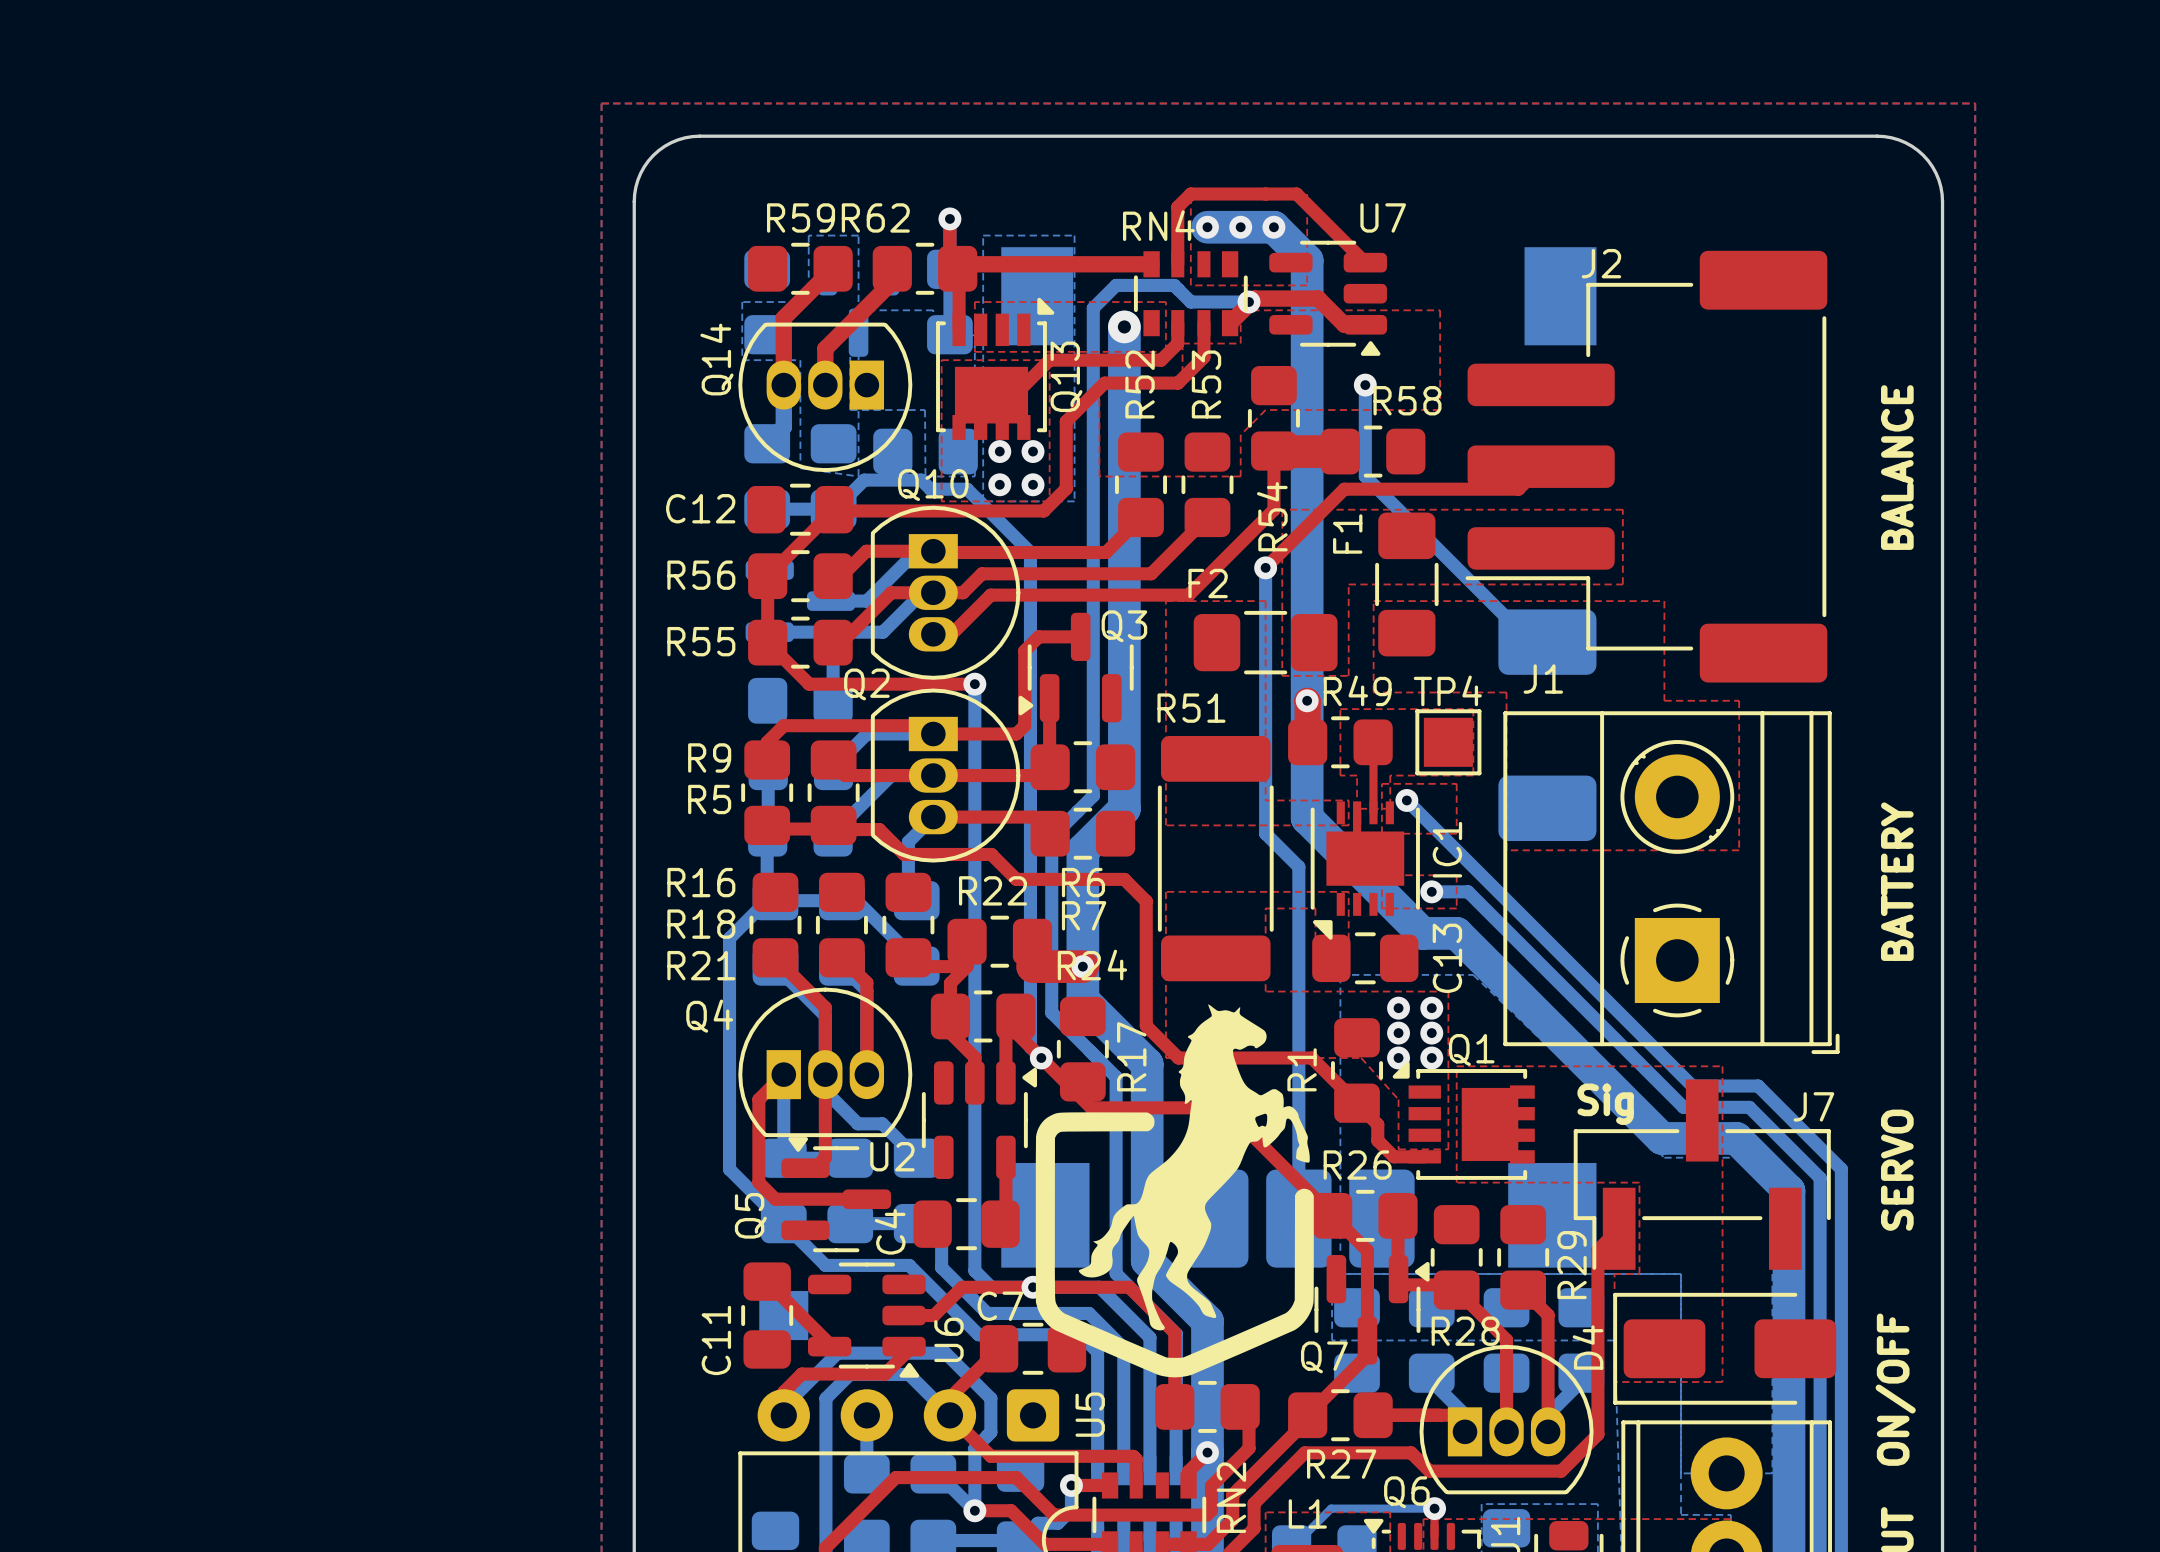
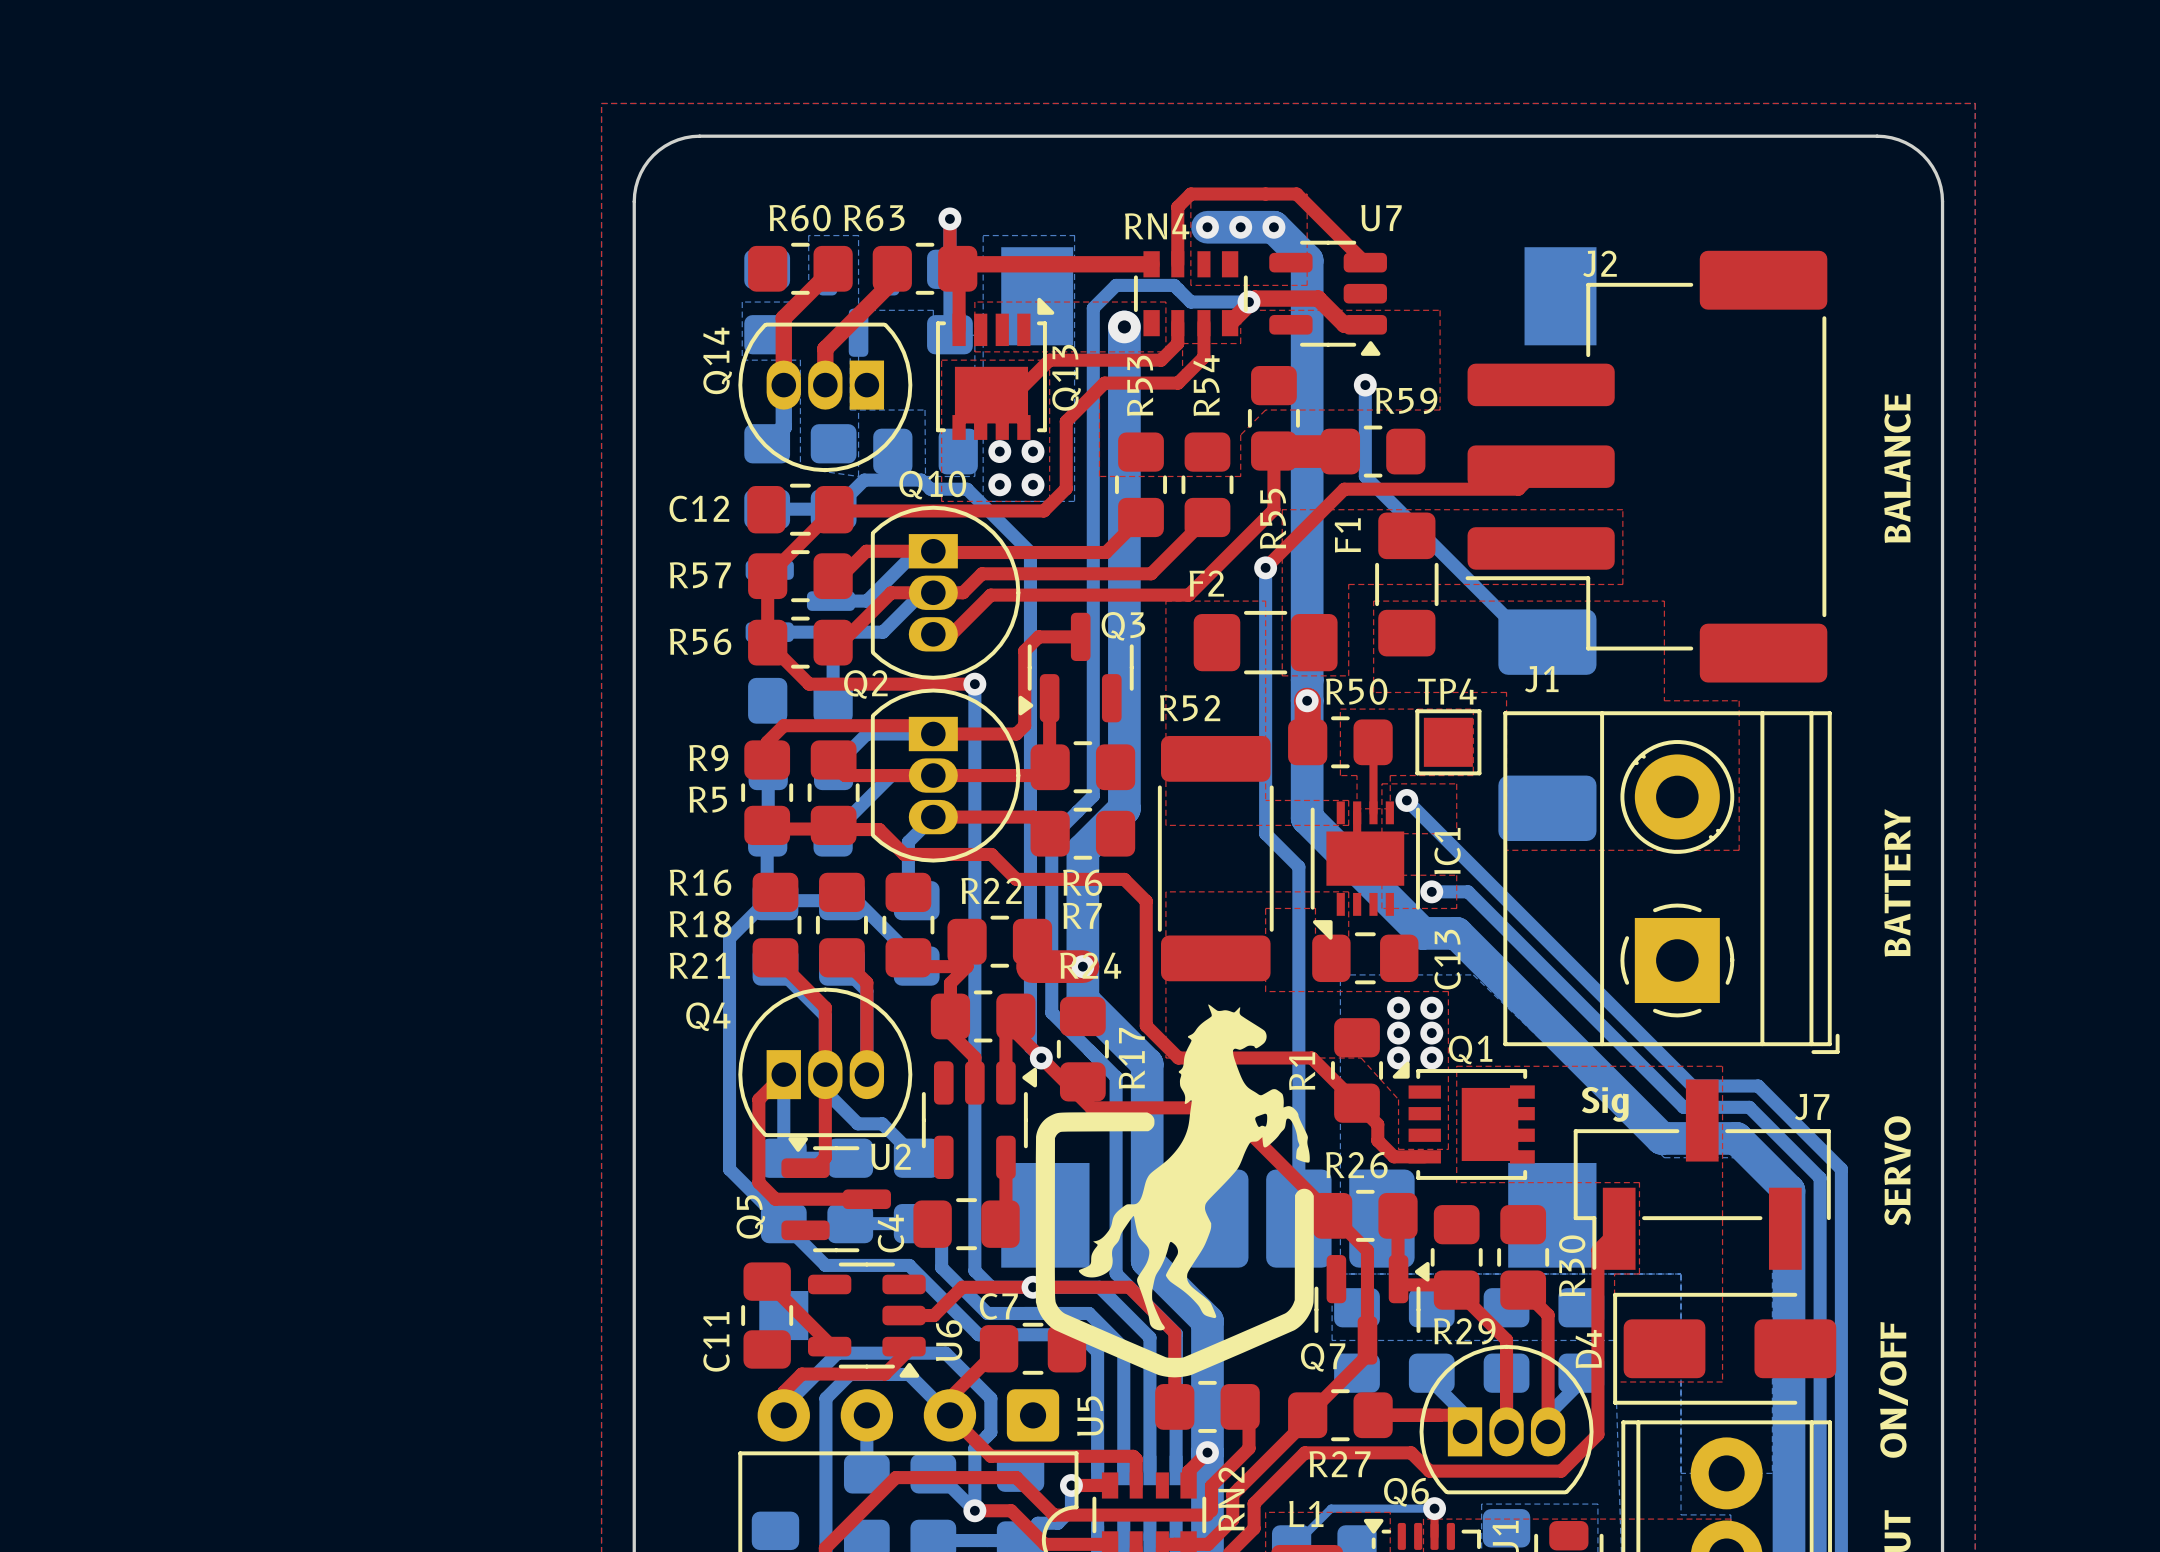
R59 name: R59 (801, 217) -> R60 (800, 218)
R62 name: R62 (875, 217) -> R63 (874, 218)
R52 name: R52 (1140, 384) -> R53 (1140, 385)
R53 name: R53 (1206, 384) -> R54 (1206, 385)
R58 name: R58 (1407, 400) -> R59 (1406, 400)
R54 name: R54 (1272, 516) -> R55 (1273, 518)
R56 name: R56 (701, 575) -> R57 (700, 575)
R55 name: R55 (701, 641) -> R56 (700, 641)
R49 name: R49 (1357, 690) -> R50 (1356, 691)
R51 name: R51 (1191, 708) -> R52 (1190, 708)
R29 name: R29 (1572, 1265) -> R30 (1572, 1265)
R28 name: R28 (1465, 1331) -> R29 (1464, 1331)

